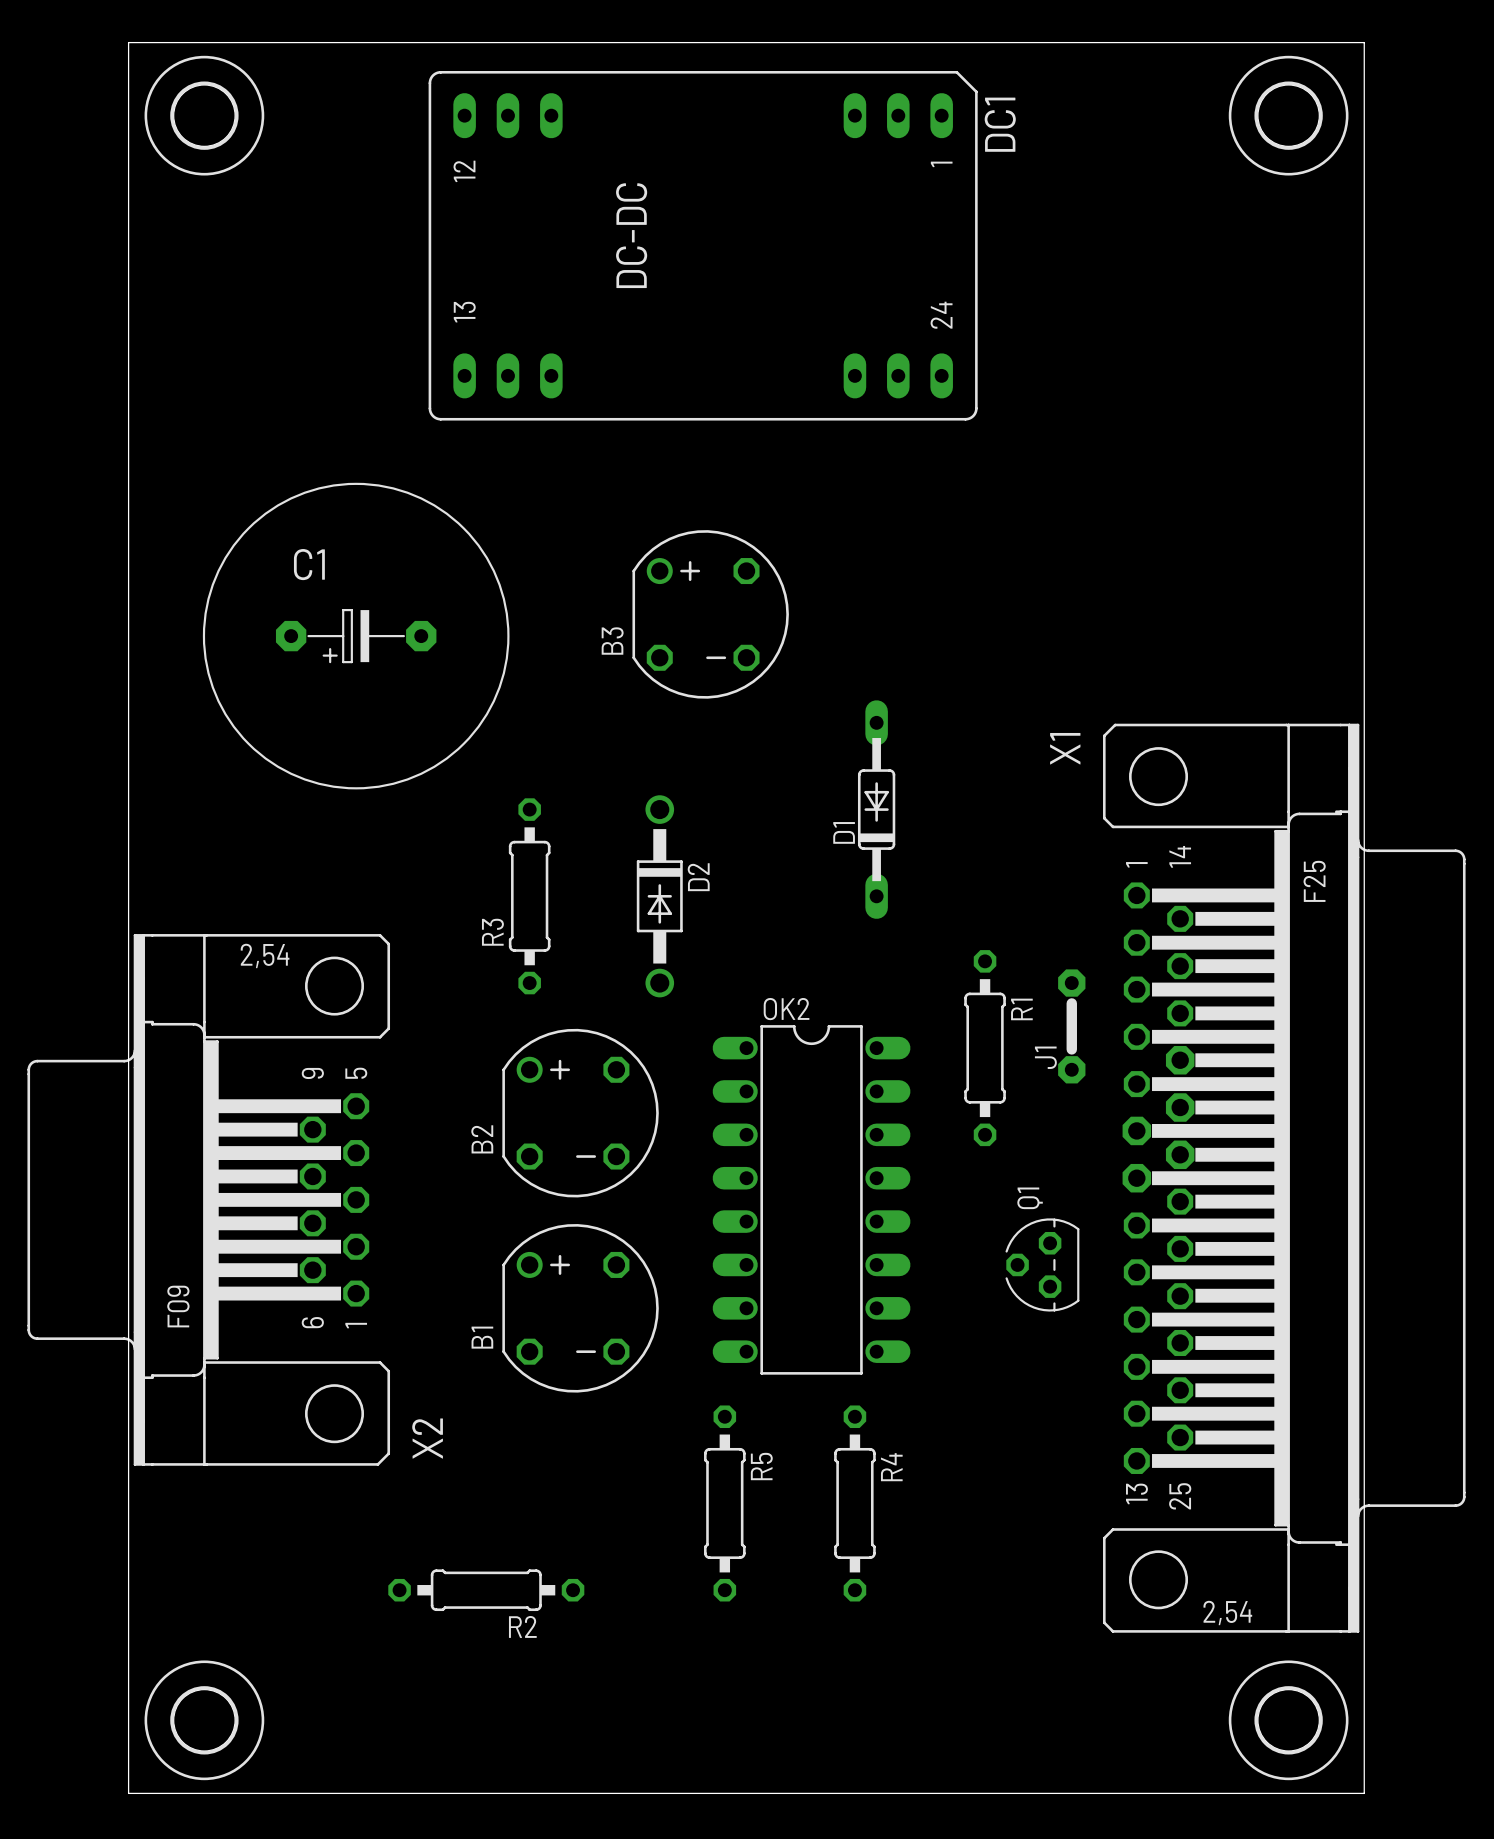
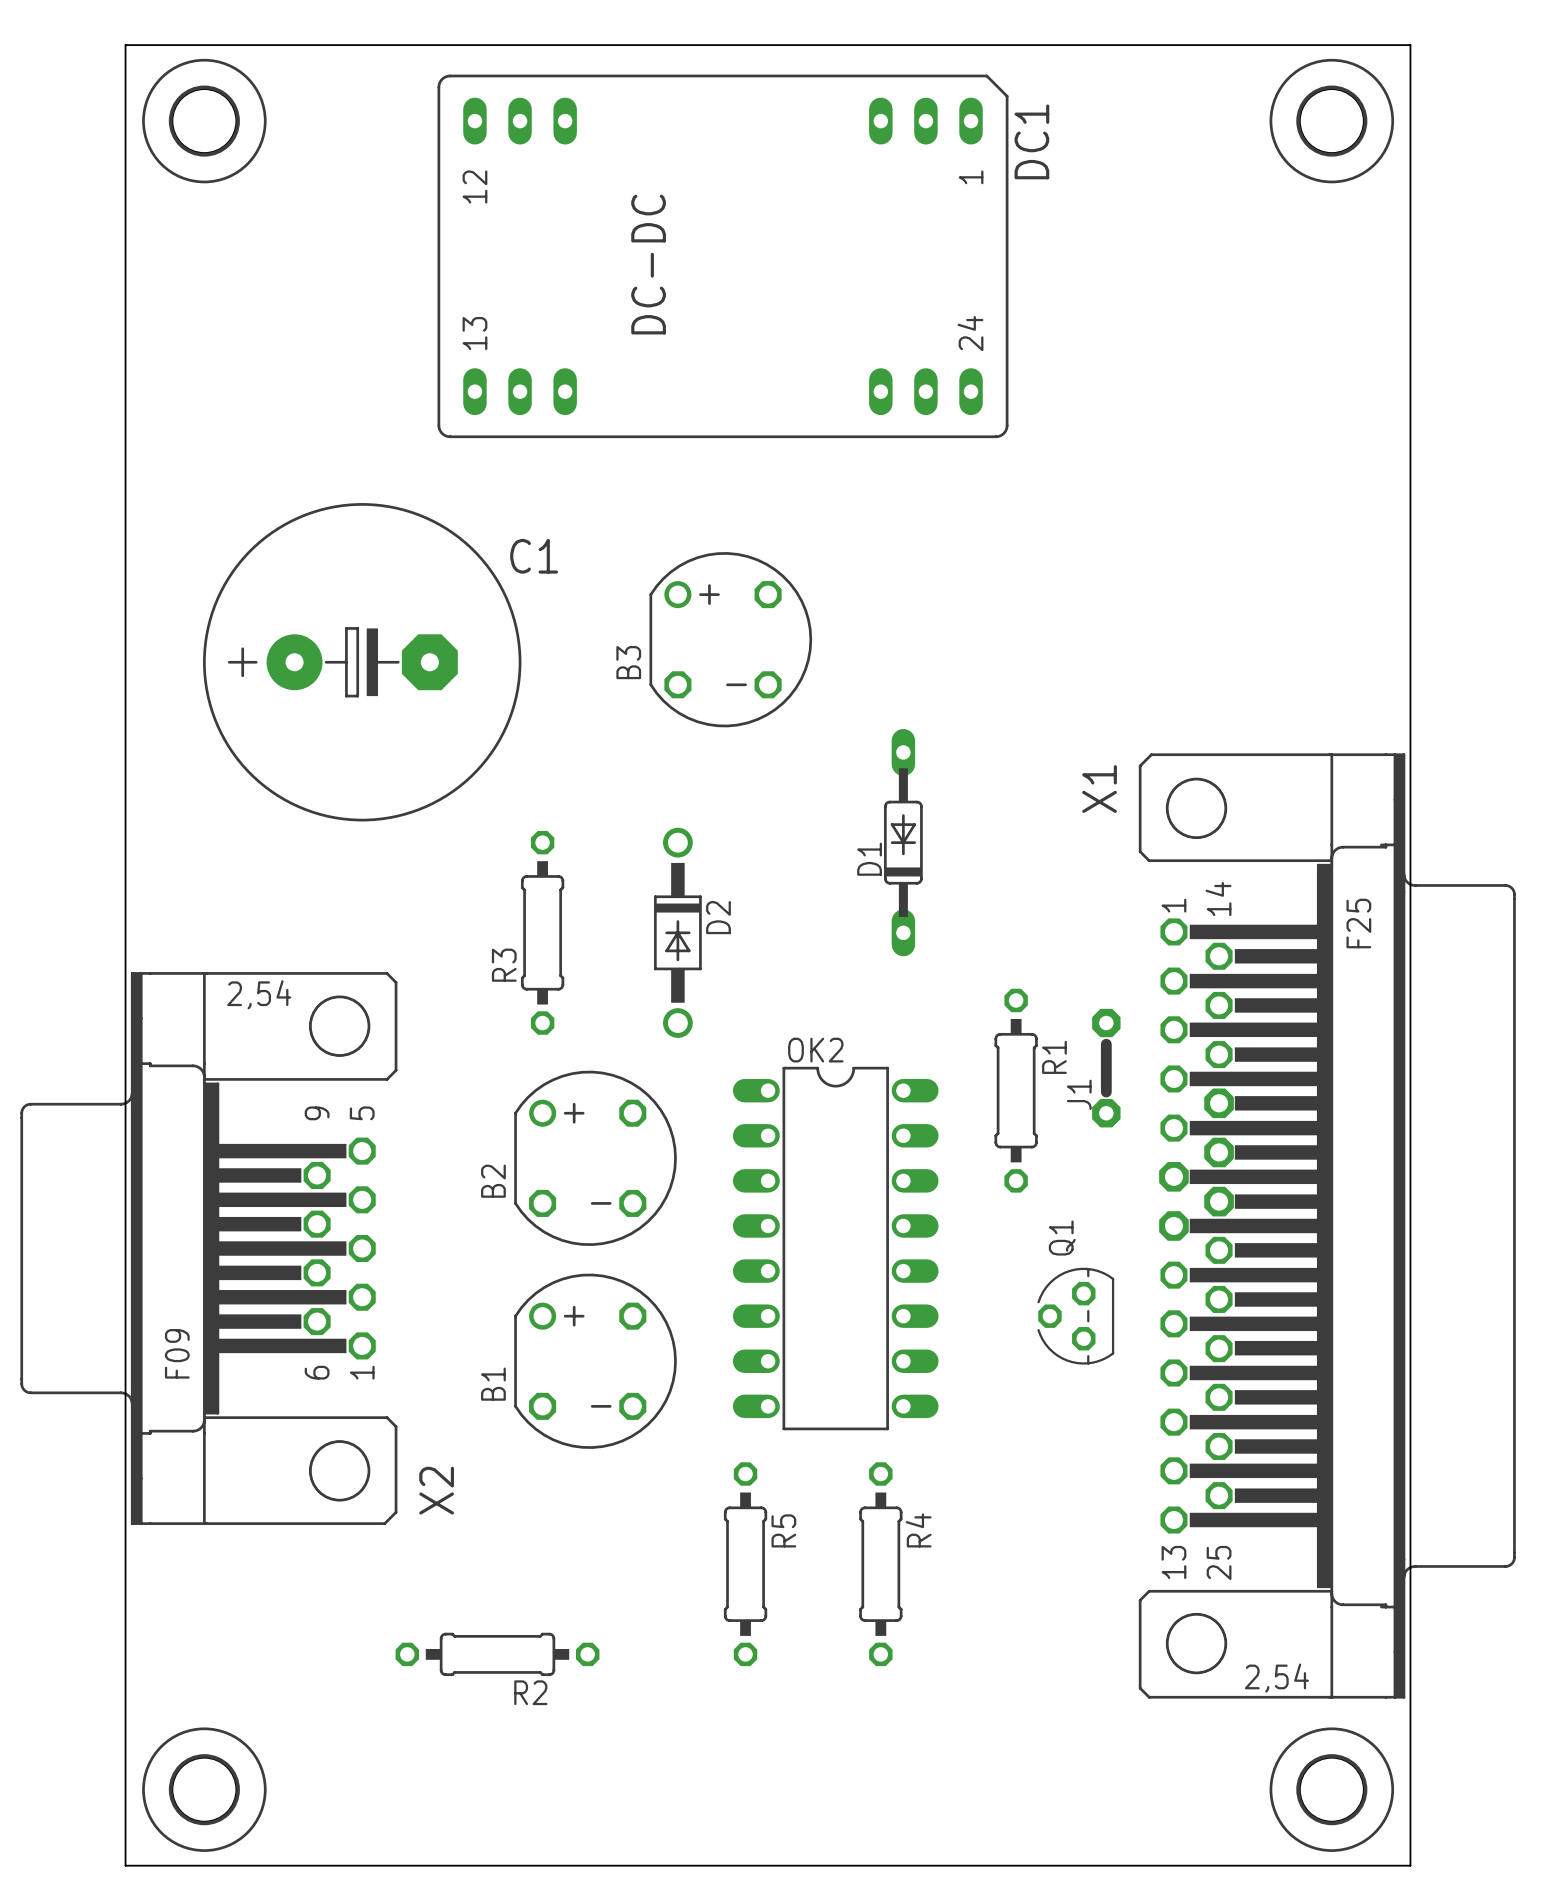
C1 footprint: [202, 482, 510, 790] -> [203, 503, 522, 822]
C1 name position: C1 (309, 564) -> C1 (534, 556)

